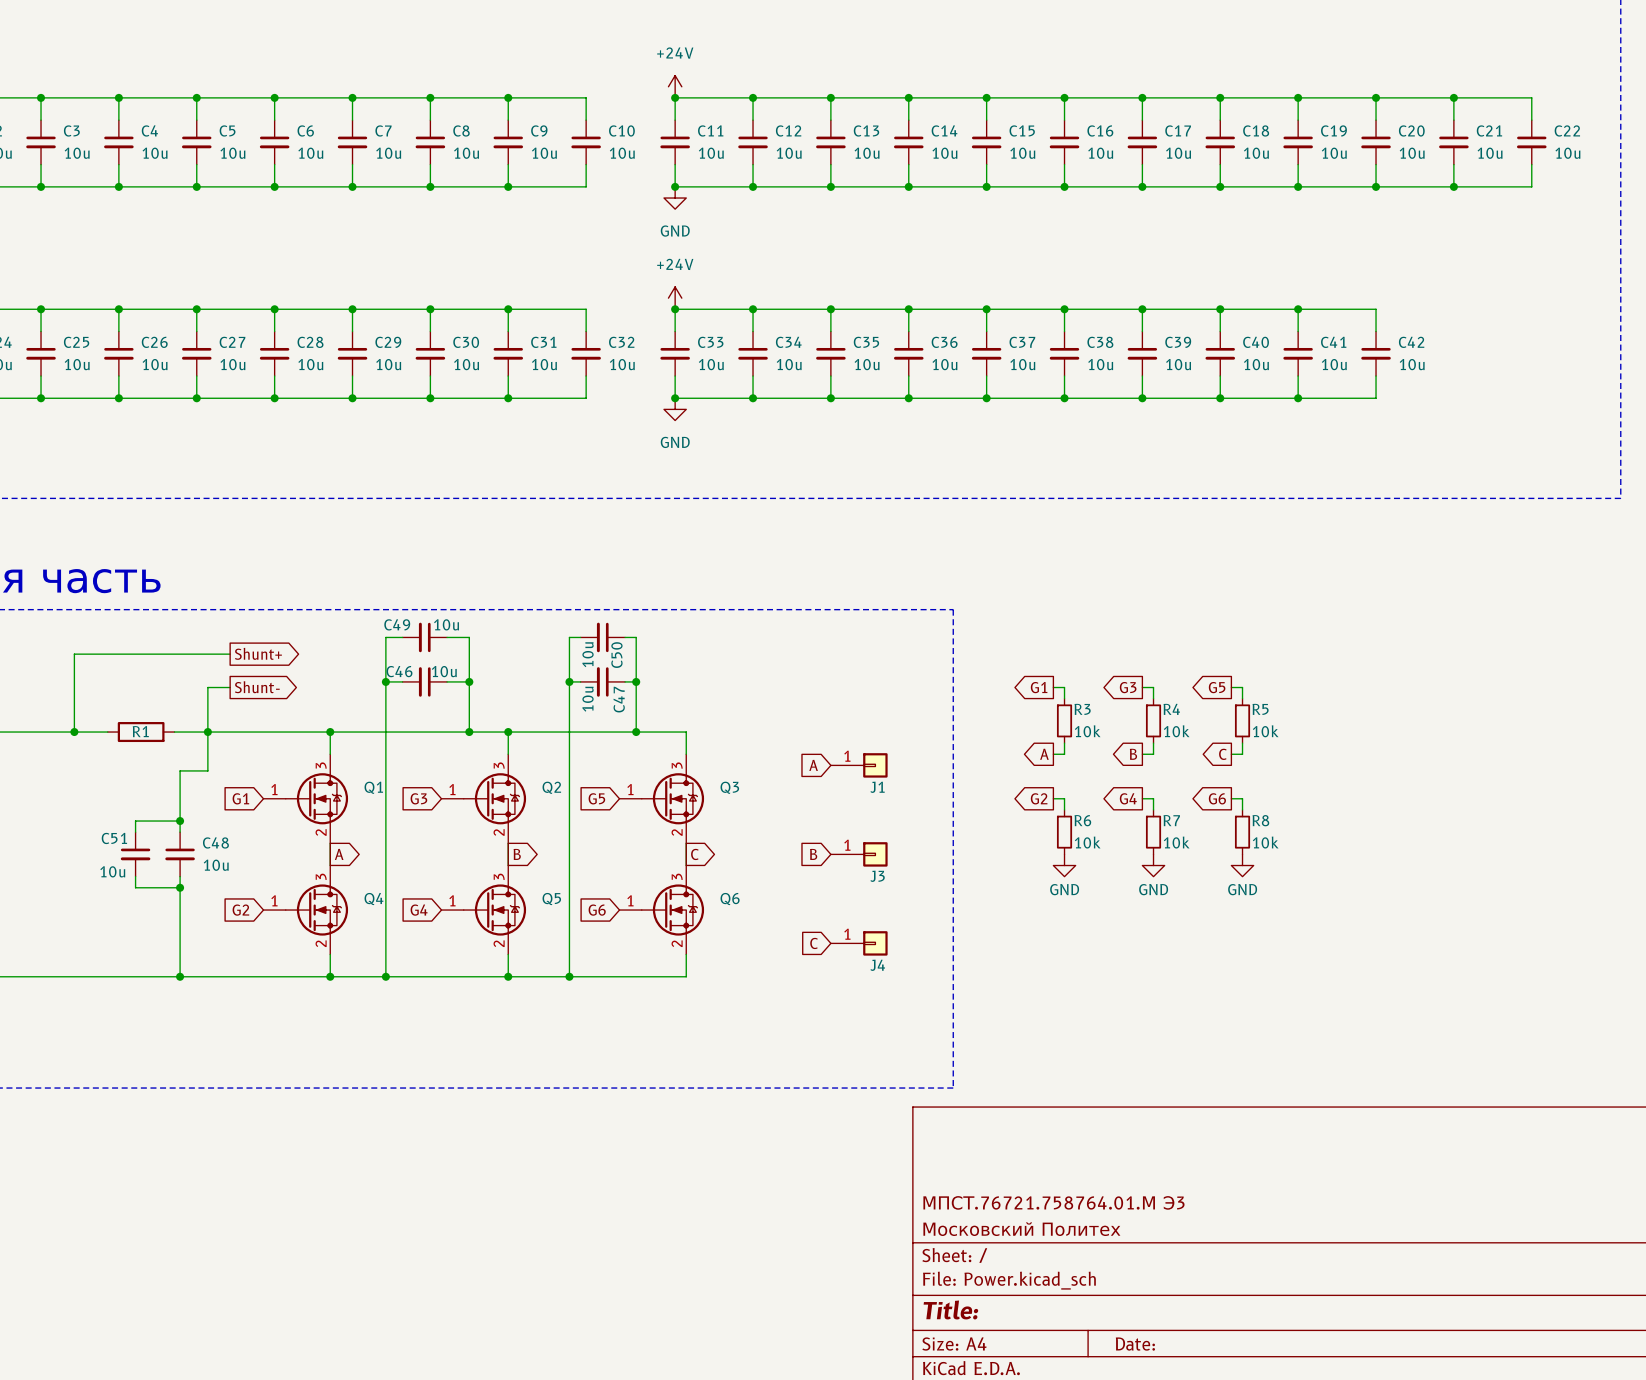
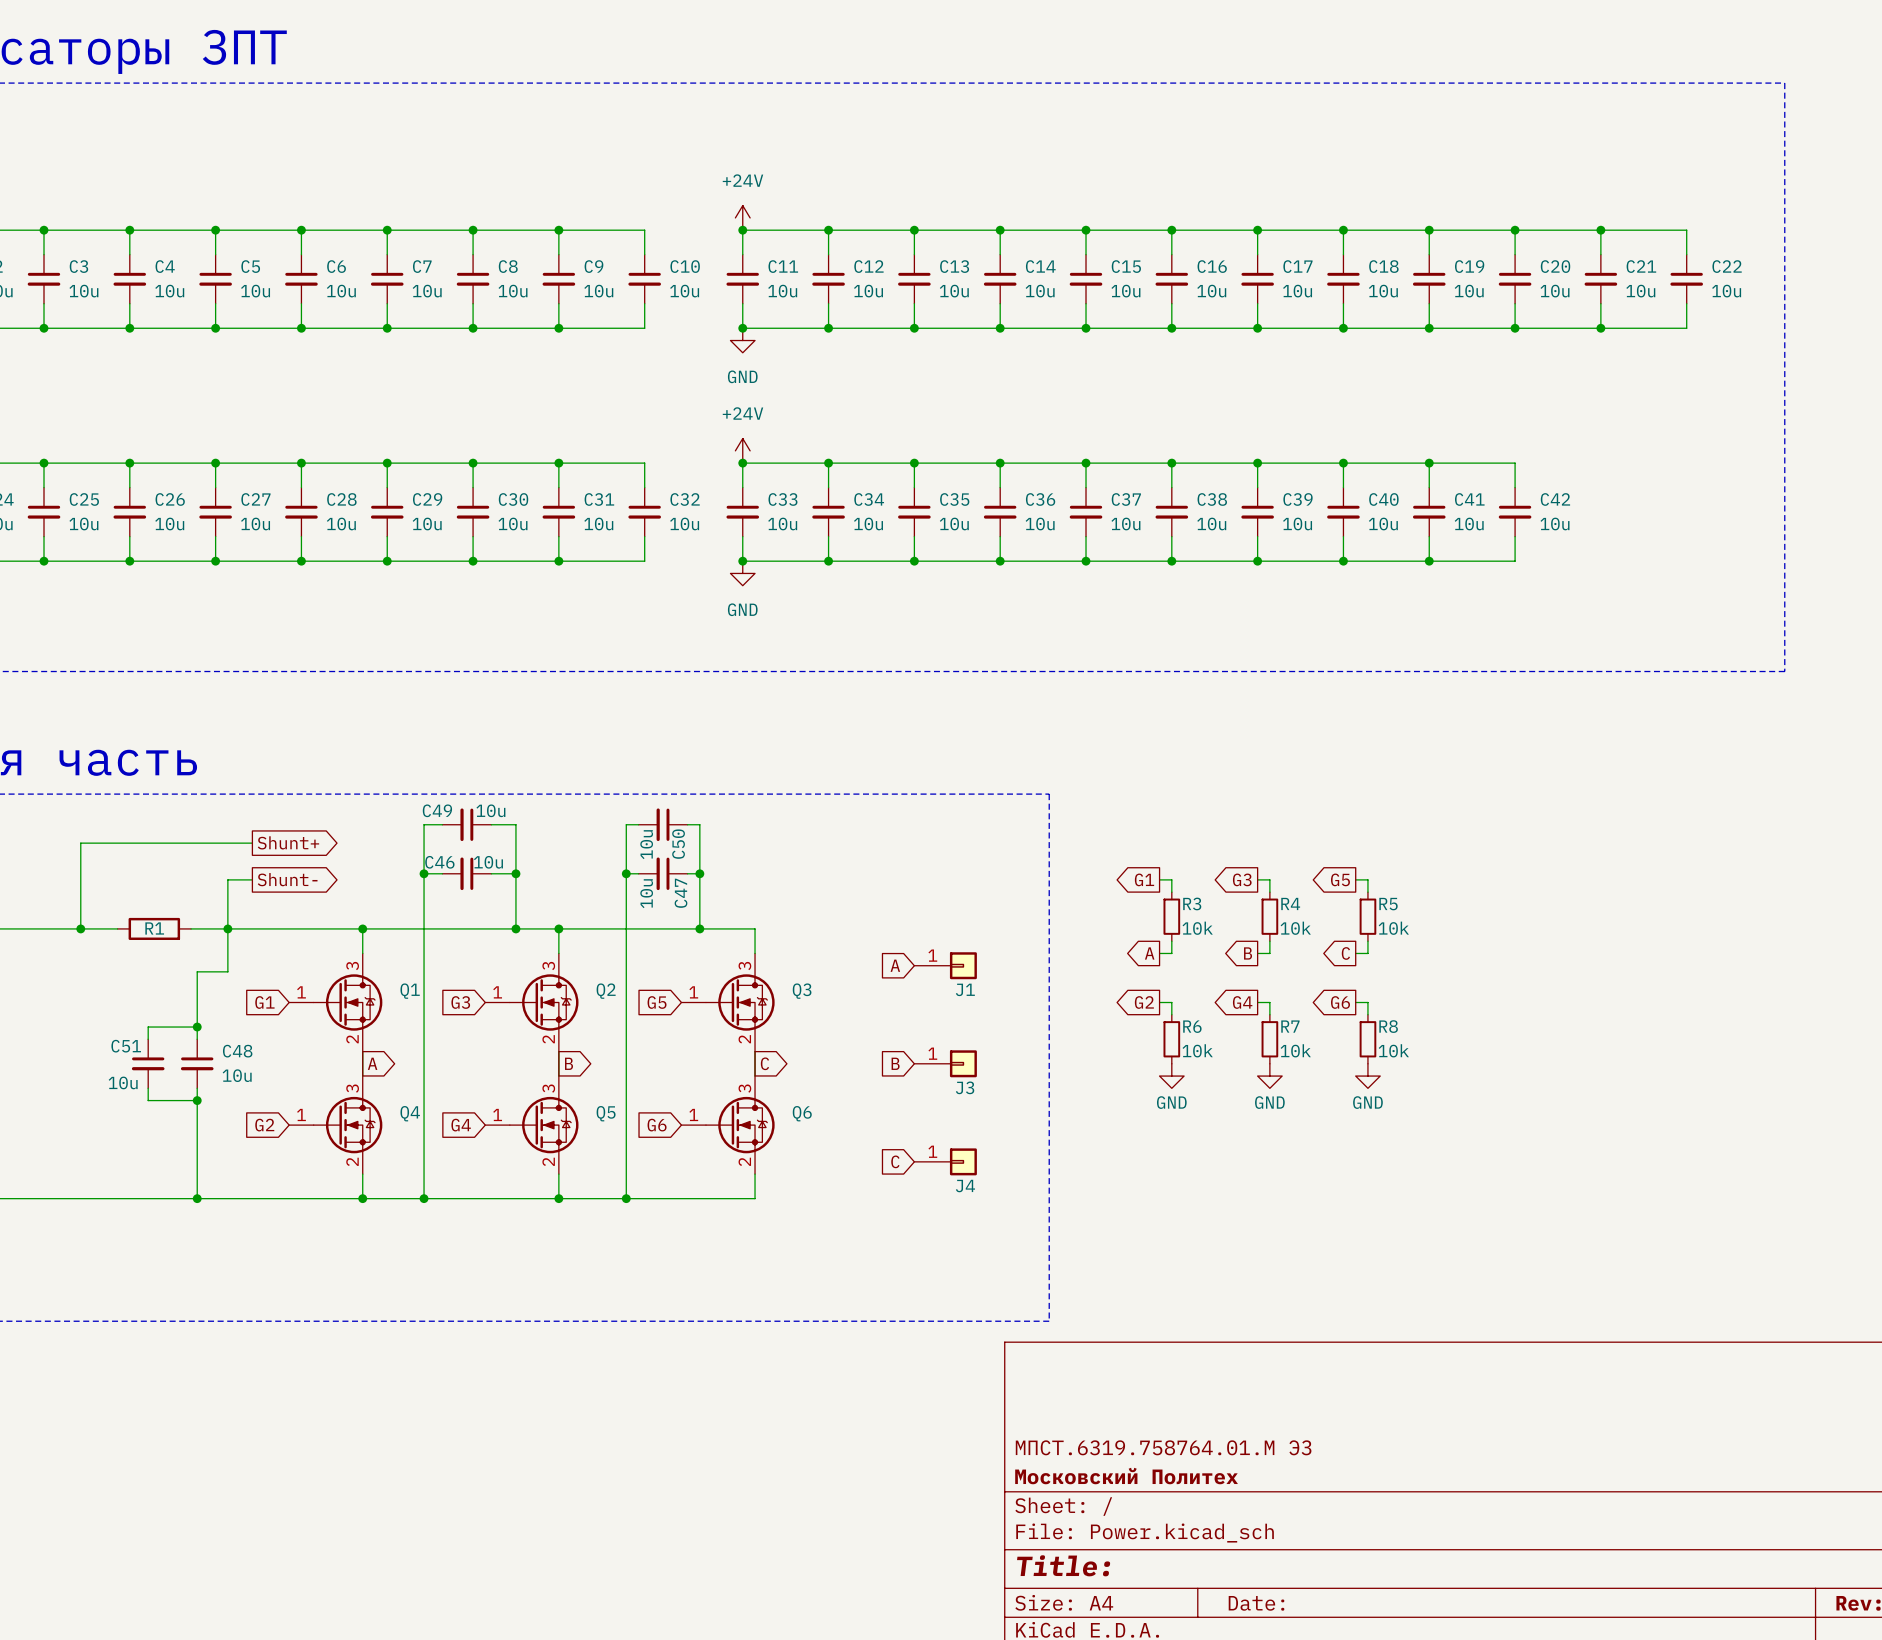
title block: МПСТ.76721.758764.01.М Э3 (1053, 1202) -> МПСТ.6319.758764.01.М Э3 (1163, 1447)

